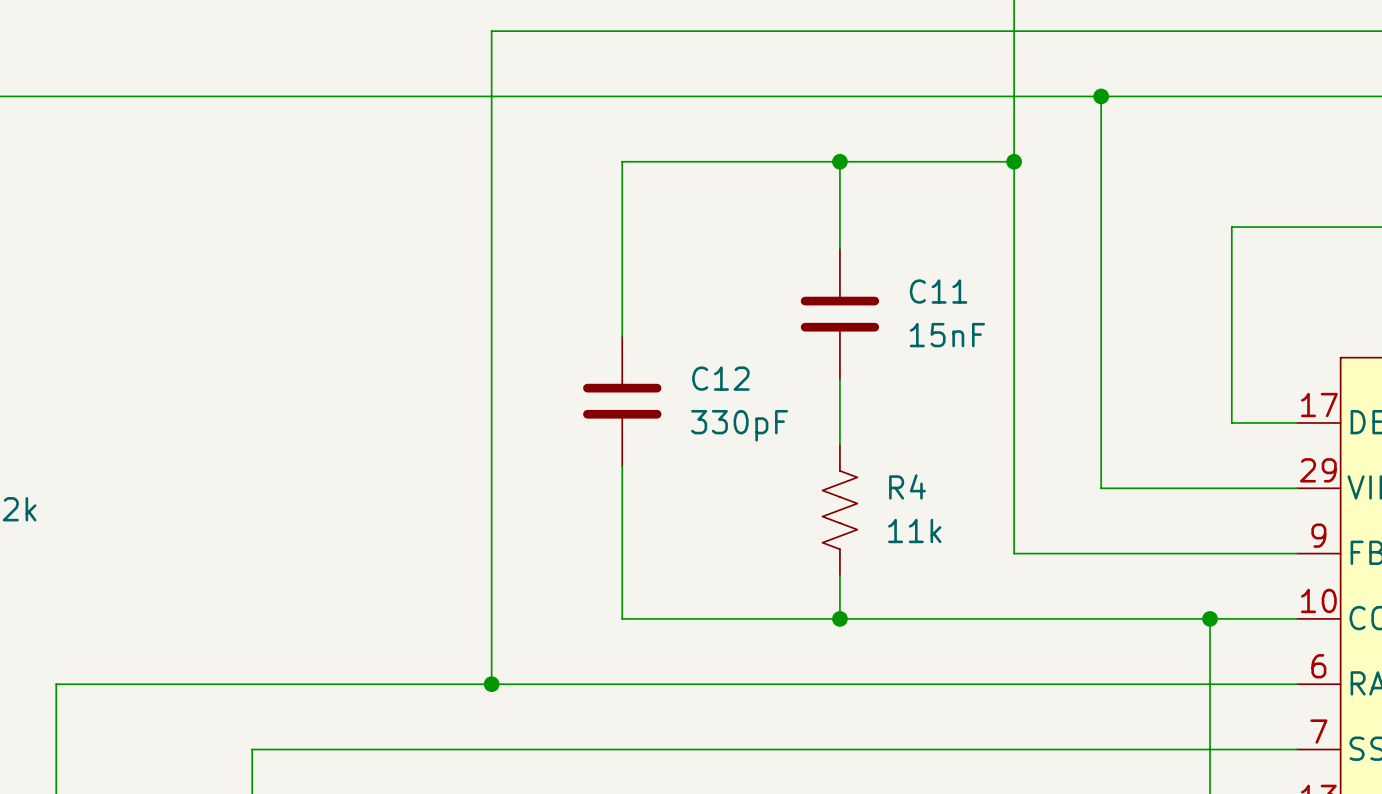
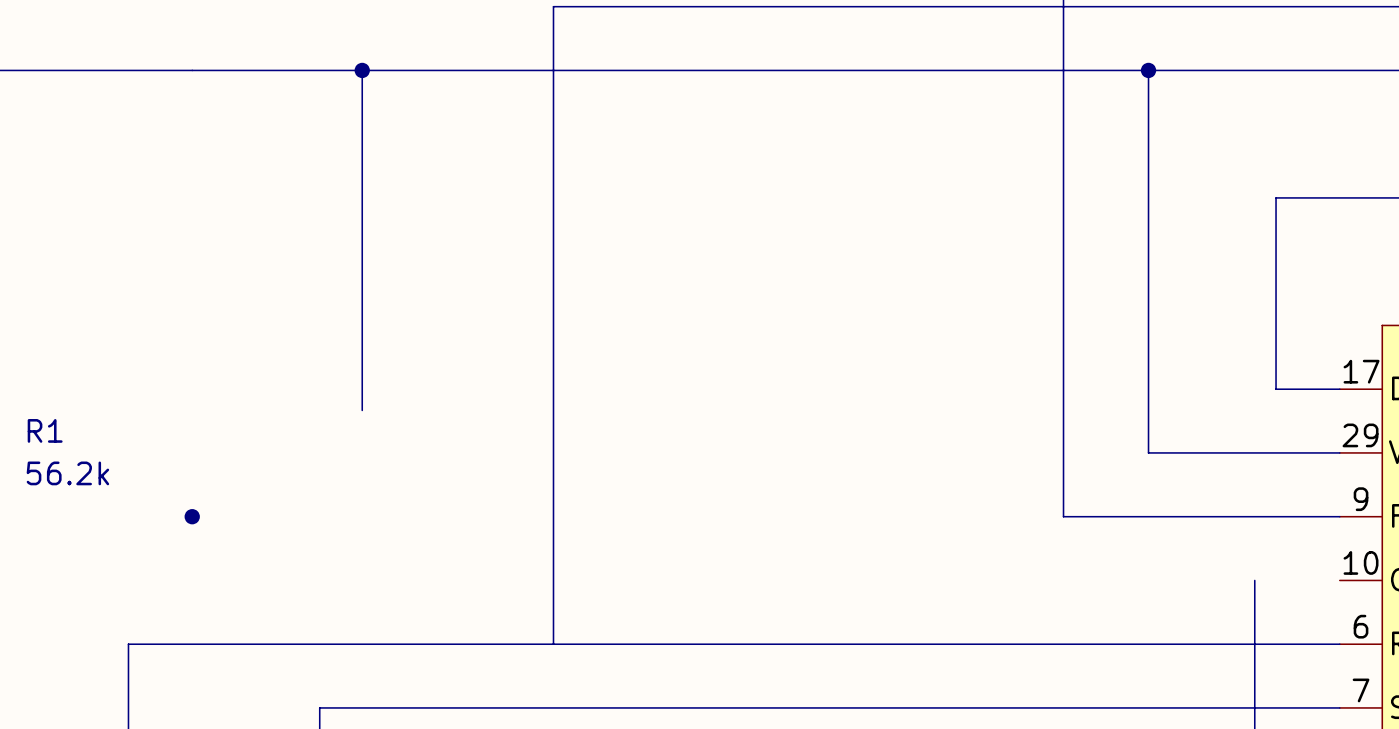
wire: none -> (362, 70) (362, 410)
junction: none -> (362, 70)
wire: (839, 161) (839, 248) -> none
junction: (839, 161) -> none
wire: (1014, 161) (622, 161) (622, 335) -> none
junction: (1014, 161) -> none
C11: 15nF (839, 314) -> none
wire: (839, 379) (839, 444) -> none
C12: 330pF (622, 401) -> none
wire: (622, 466) (622, 618) (1297, 618) -> none
R4: 11k (839, 510) -> none
junction: none -> (192, 516)
wire: (839, 575) (839, 618) -> none
junction: (839, 618) -> none
junction: (1210, 618) -> none
junction: (491, 684) -> none

